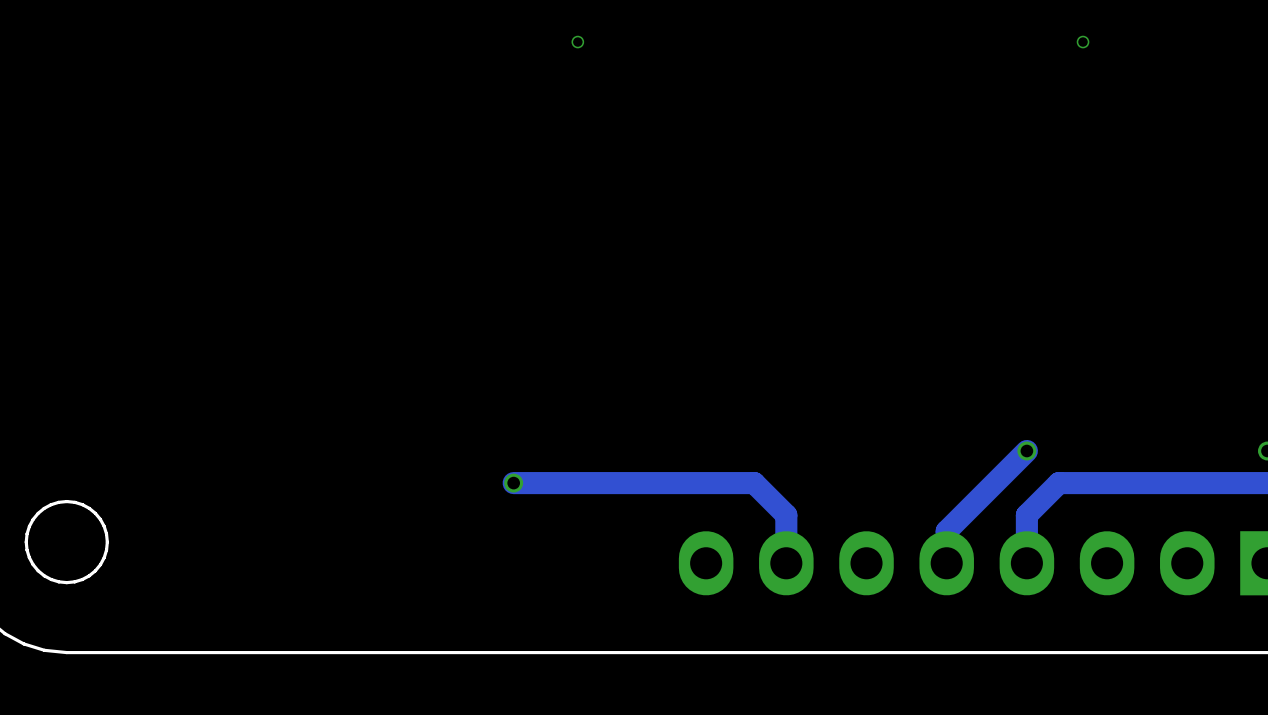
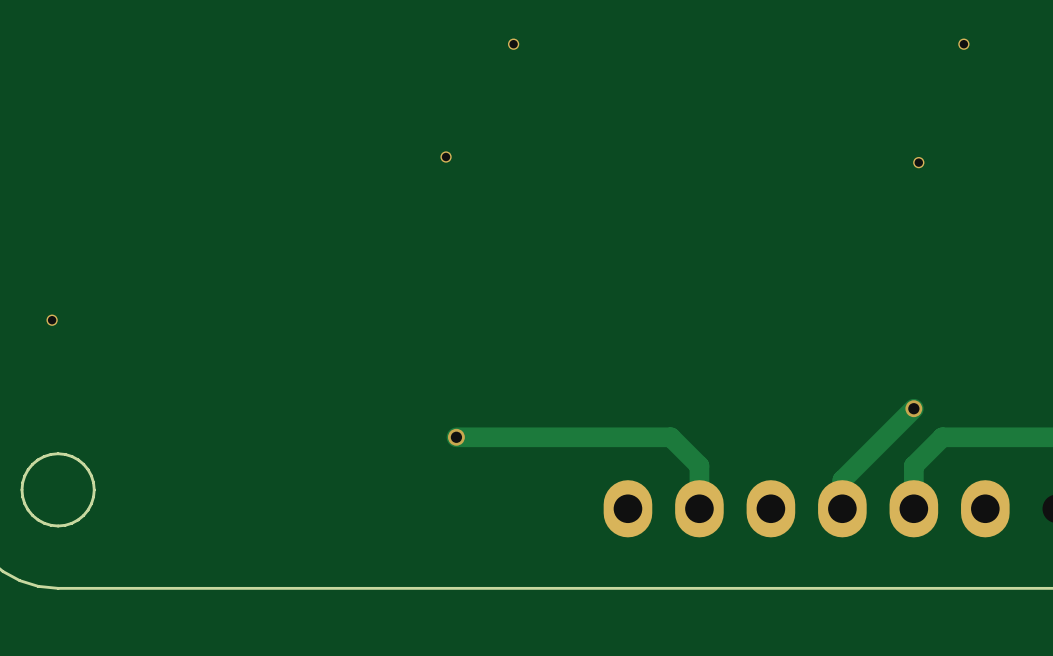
part: none -> (446, 157)
part: none -> (918, 162)
part: none -> (52, 320)

